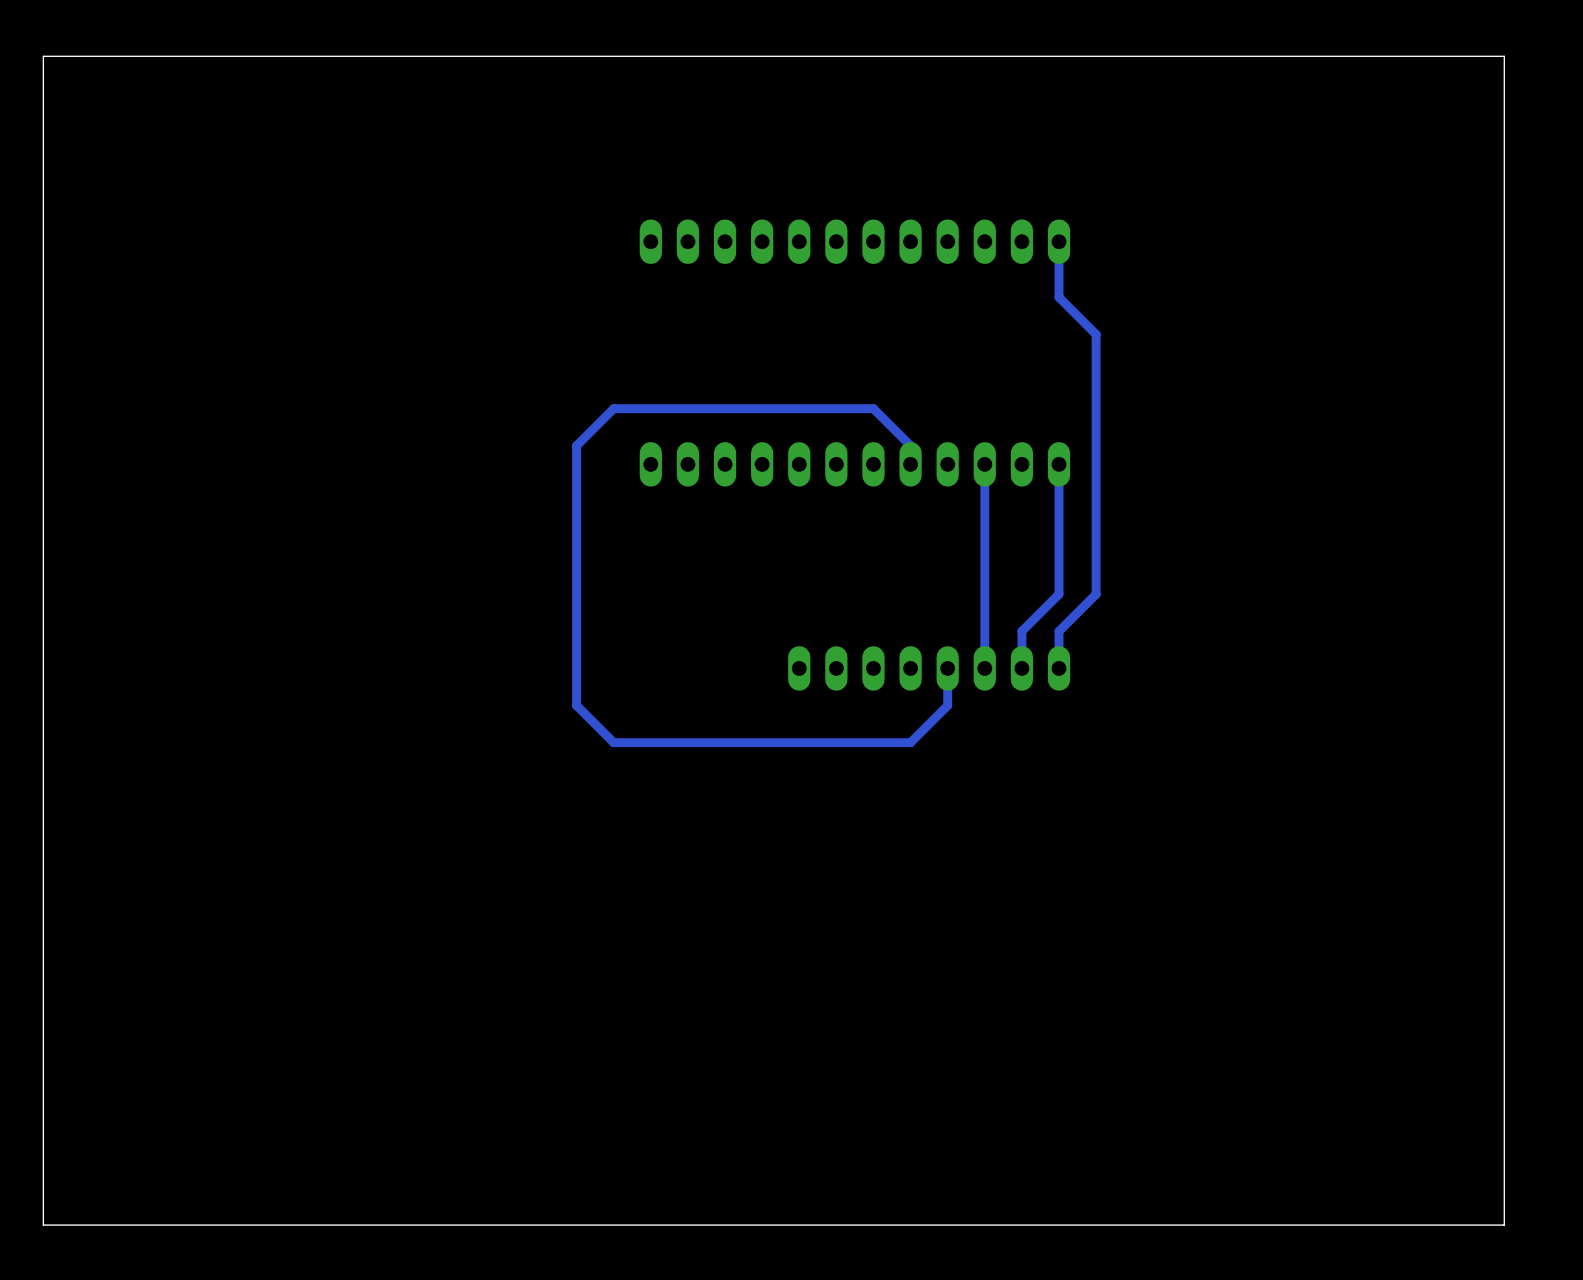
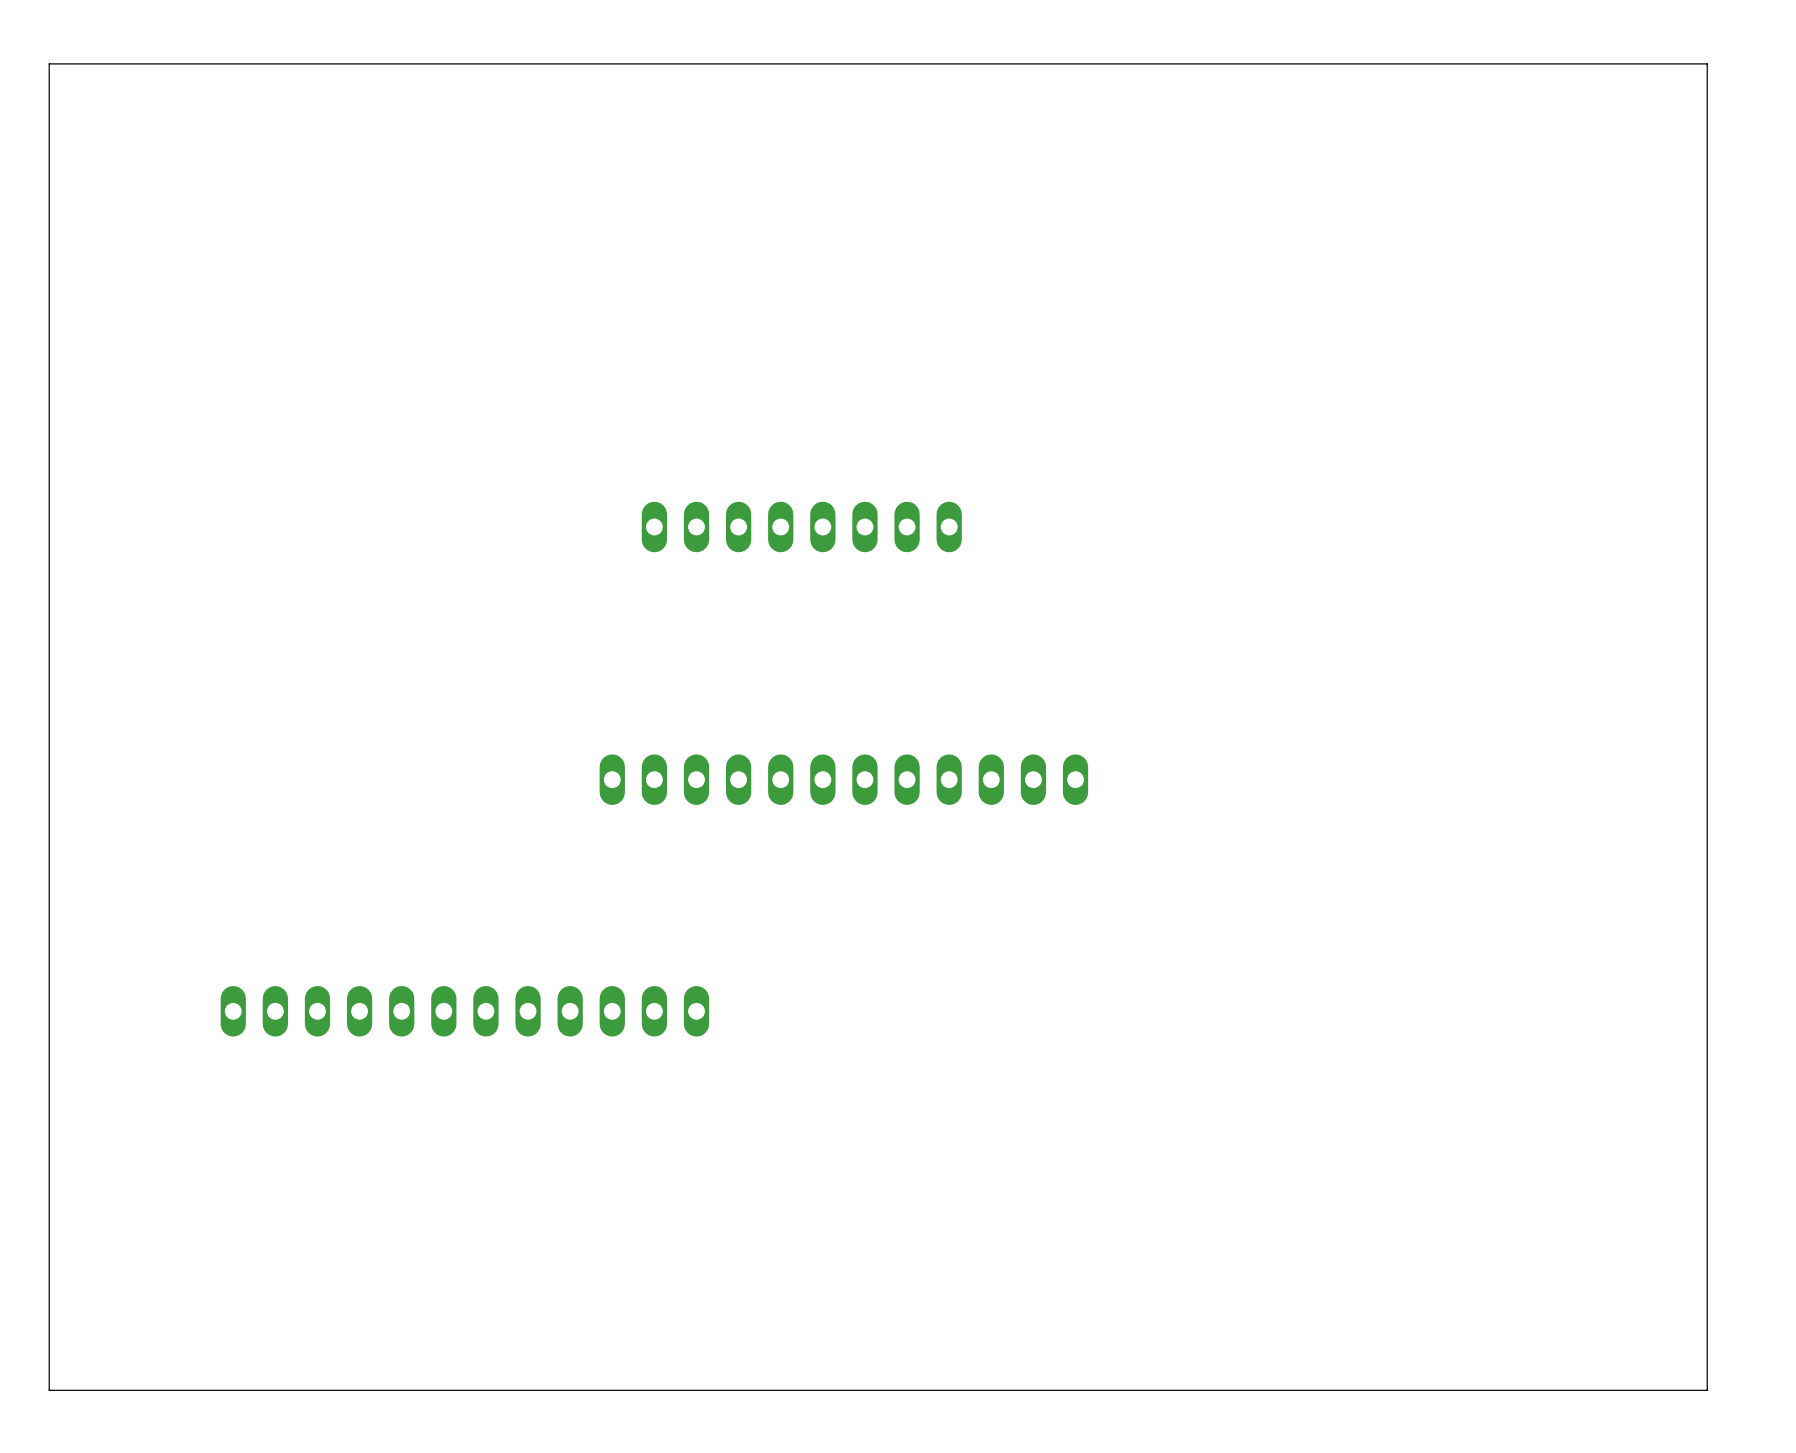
part: (854, 241) -> none
track: (1059, 241) (1059, 297) (1096, 334) (1096, 594) (1059, 631) (1059, 668) -> none
part: (854, 464) -> none
track: (910, 464) (910, 445) (873, 408) (613, 408) (576, 445) (576, 705) (613, 742) (910, 742) (947, 705) (947, 668) -> none
track: (984, 464) (984, 668) -> none
track: (1059, 464) (1059, 594) (1021, 631) (1021, 668) -> none
part position: (929, 668) -> (801, 526)
part: none -> (843, 779)
part: none -> (464, 1011)

